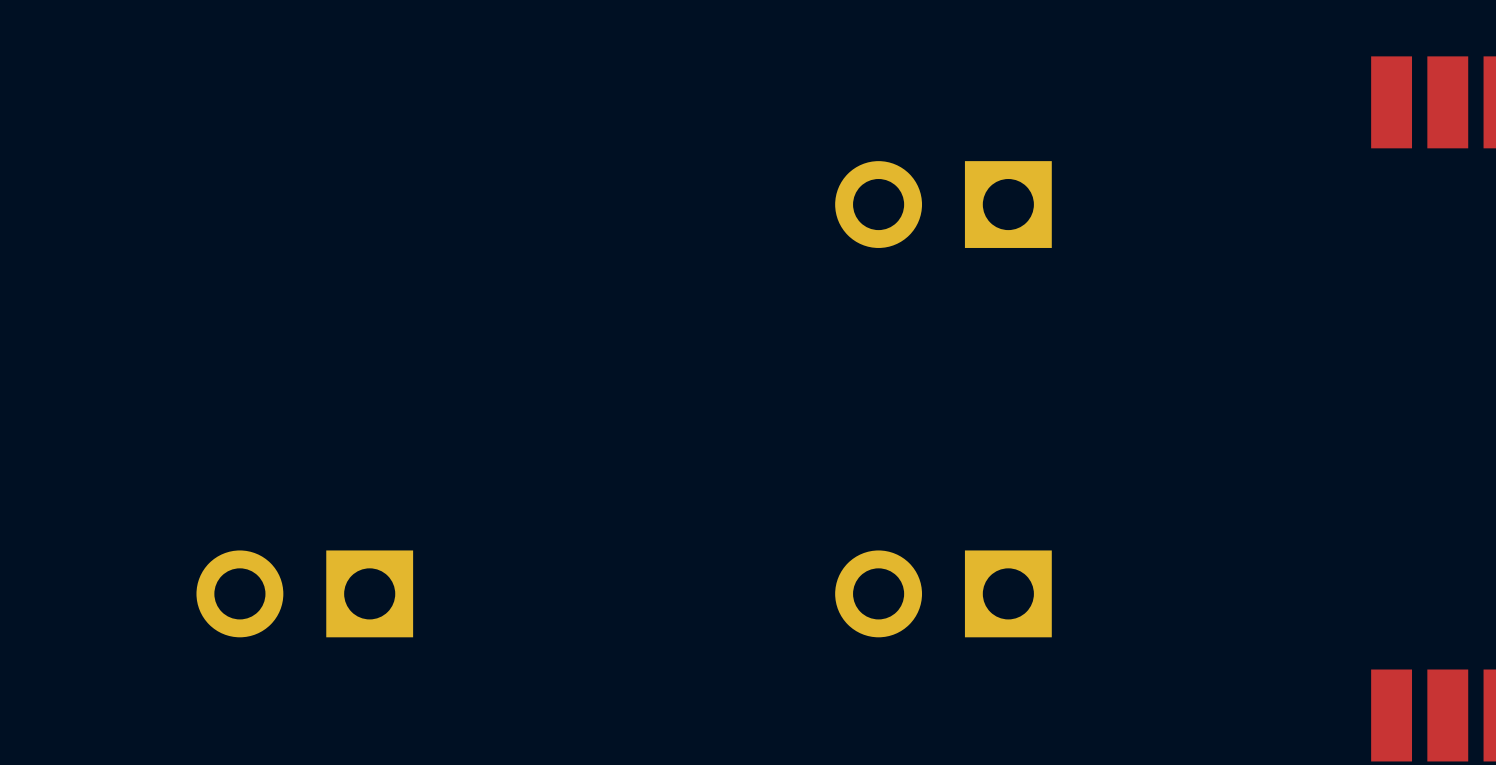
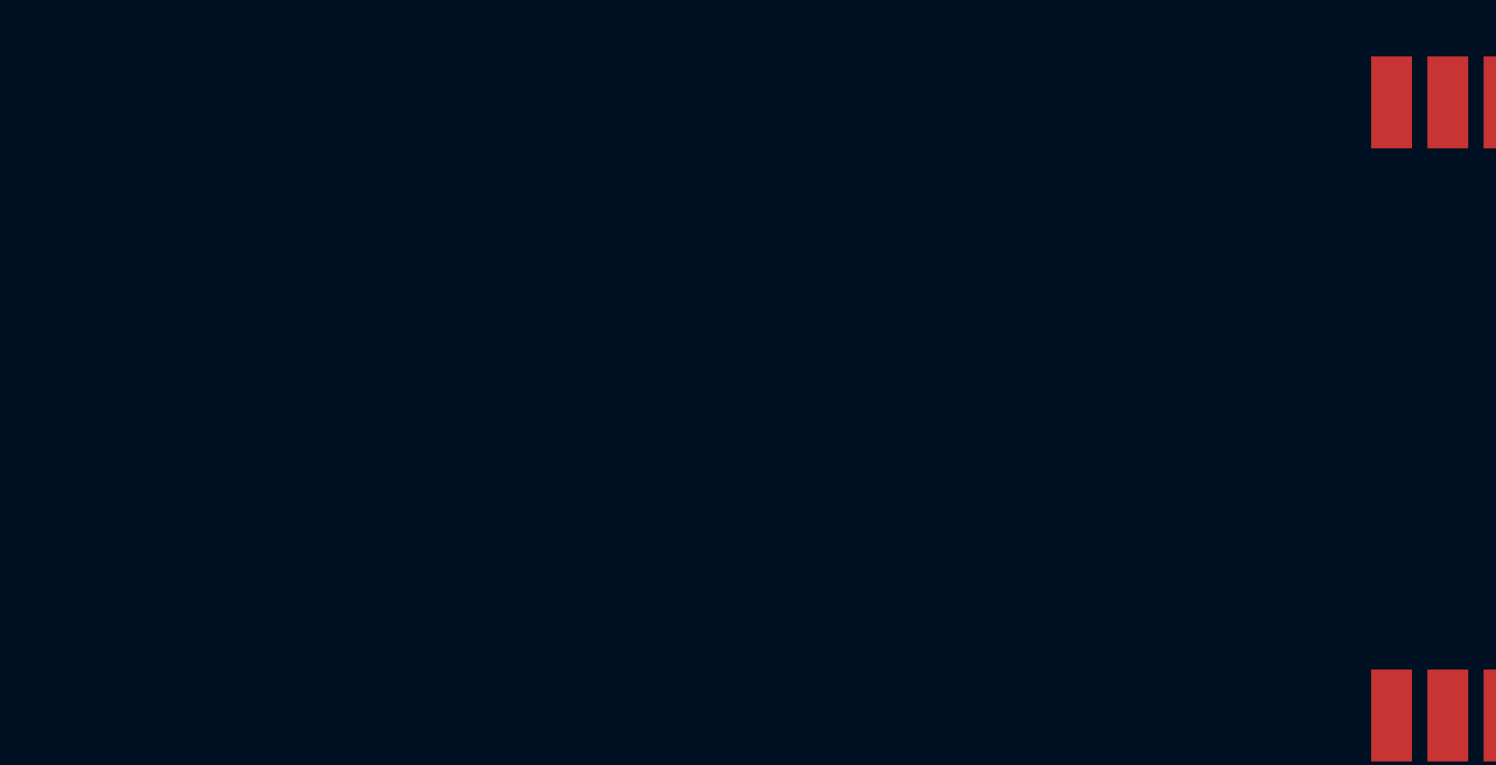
part: (943, 204) -> none
part: (304, 593) -> none
part: (943, 593) -> none

